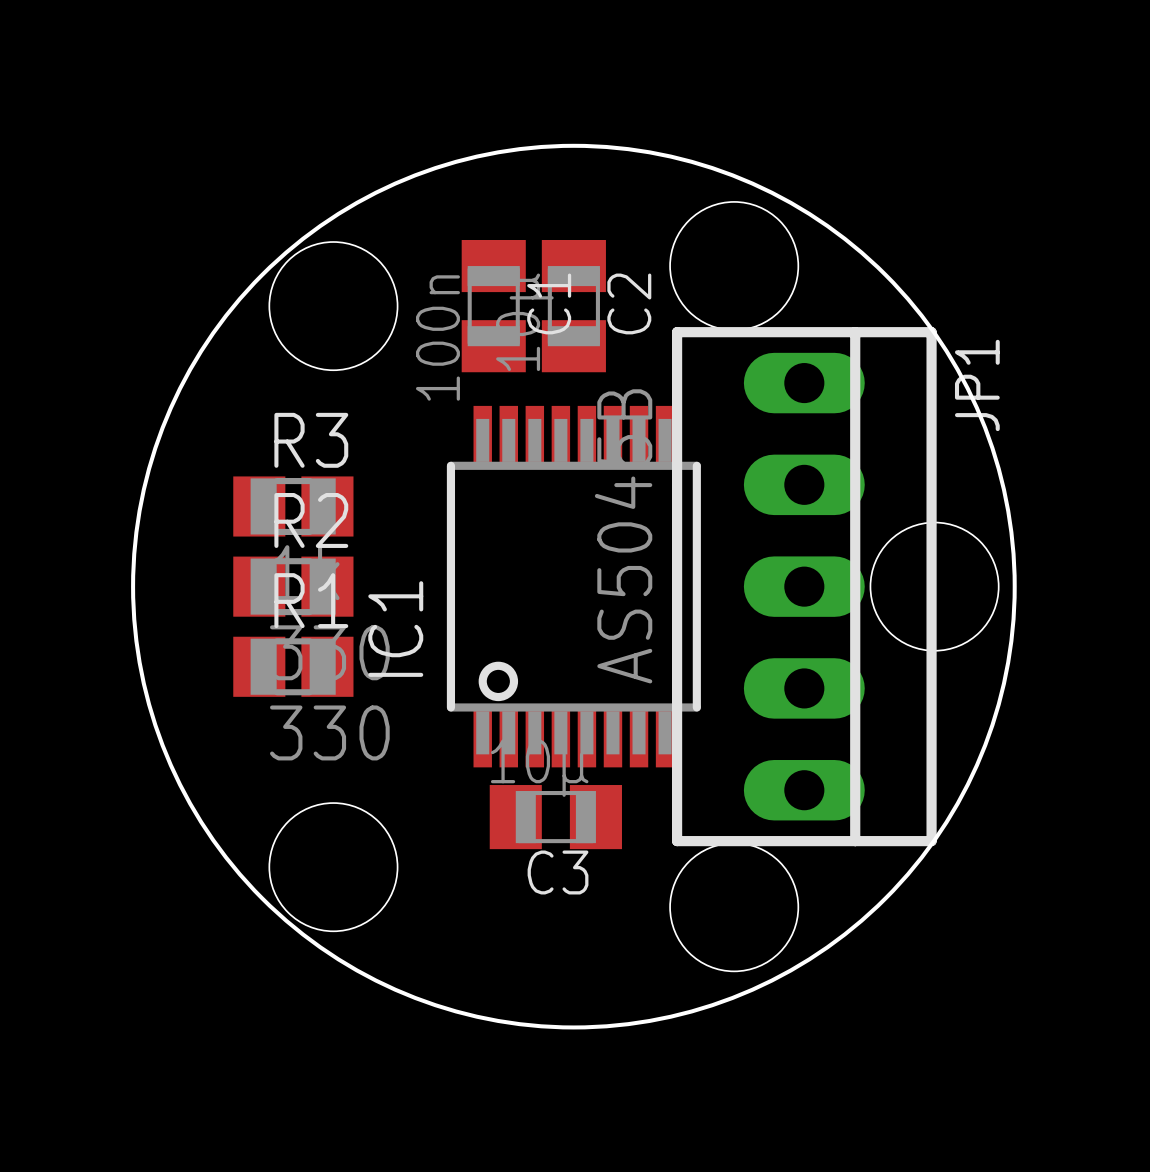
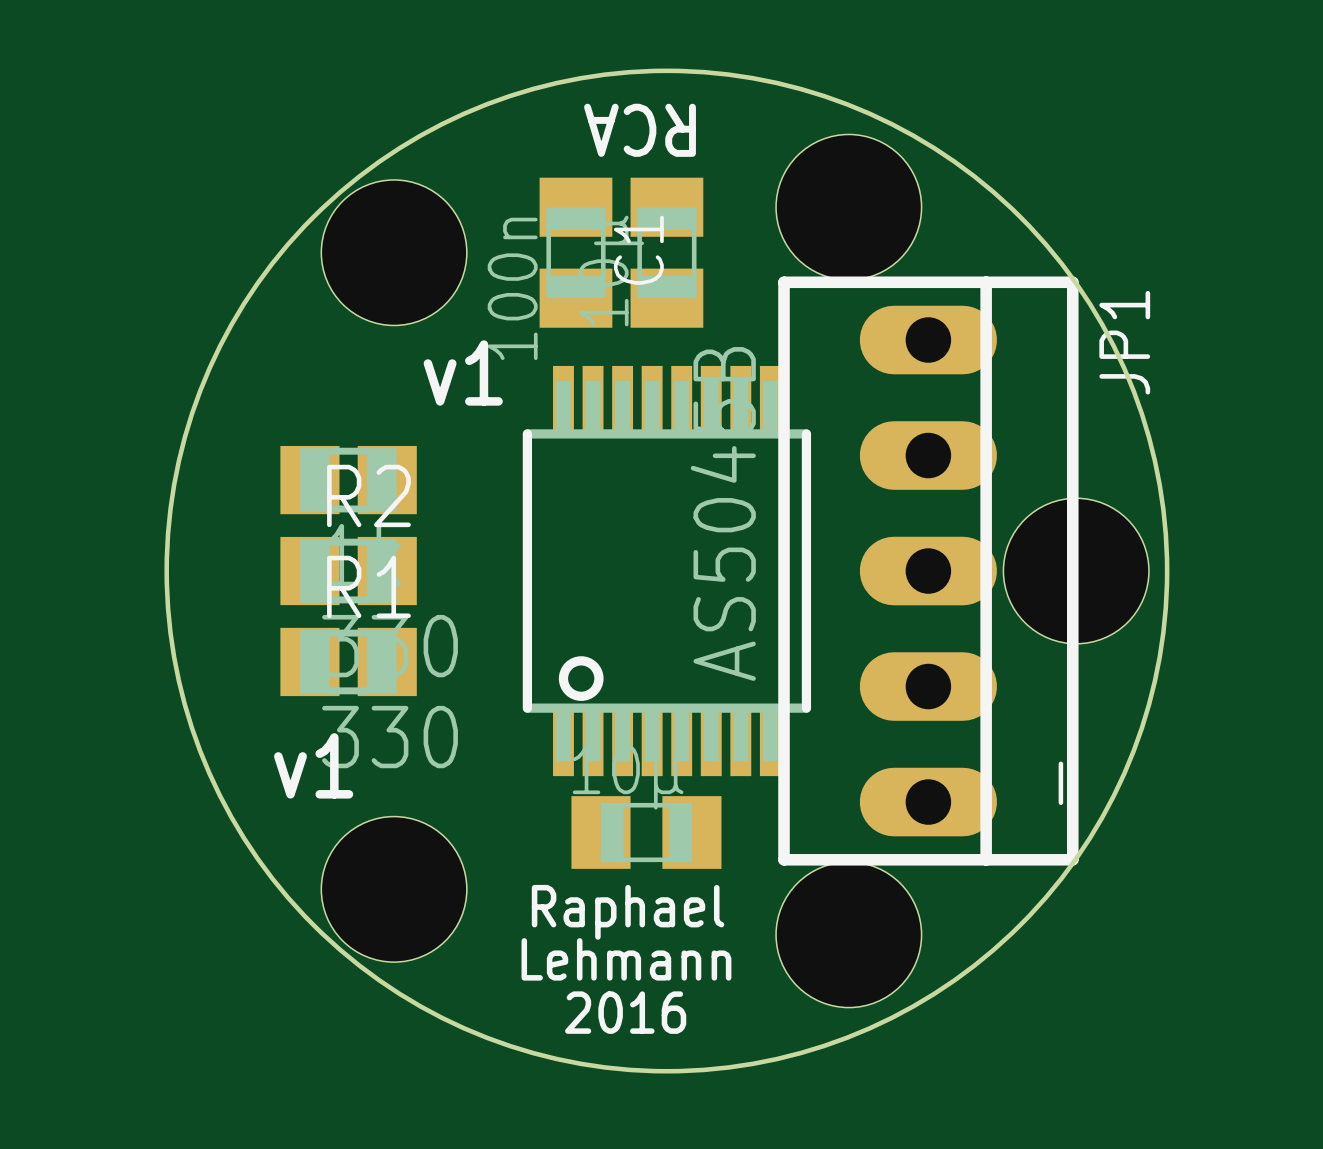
text: none -> RCA (640, 130)
C2 name: C2 (629, 303) -> none
text: none -> v1 (463, 372)
R3 name: R3 (311, 440) -> none
IC1 name: IC1 (395, 629) -> none
text: none -> v1 (313, 765)
text: none -> - (1060, 783)
C3 name: C3 (558, 872) -> none
text: none -> Raphael (628, 912)
text: none -> Lehmann (626, 959)
text: none -> 2016 (625, 1012)

